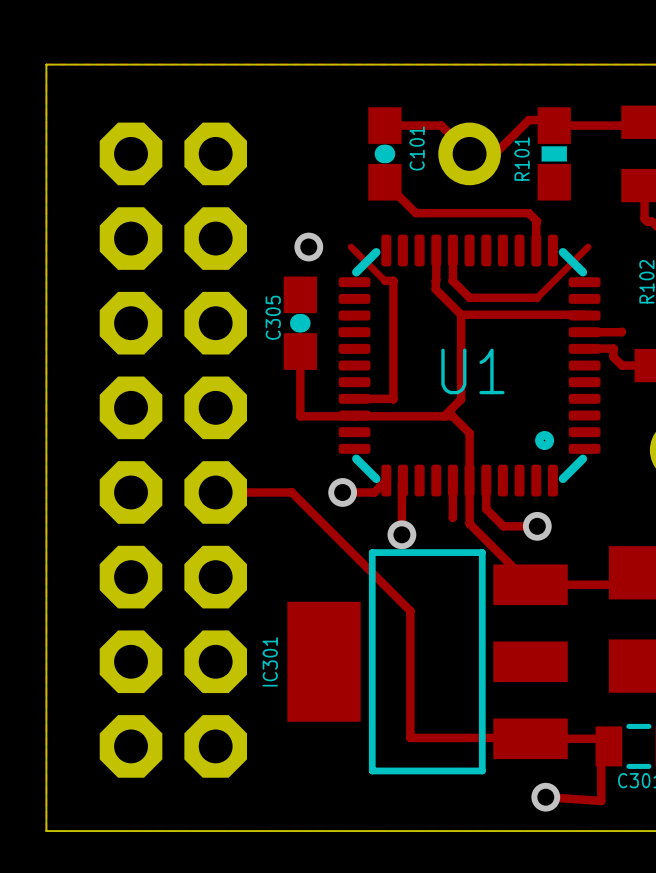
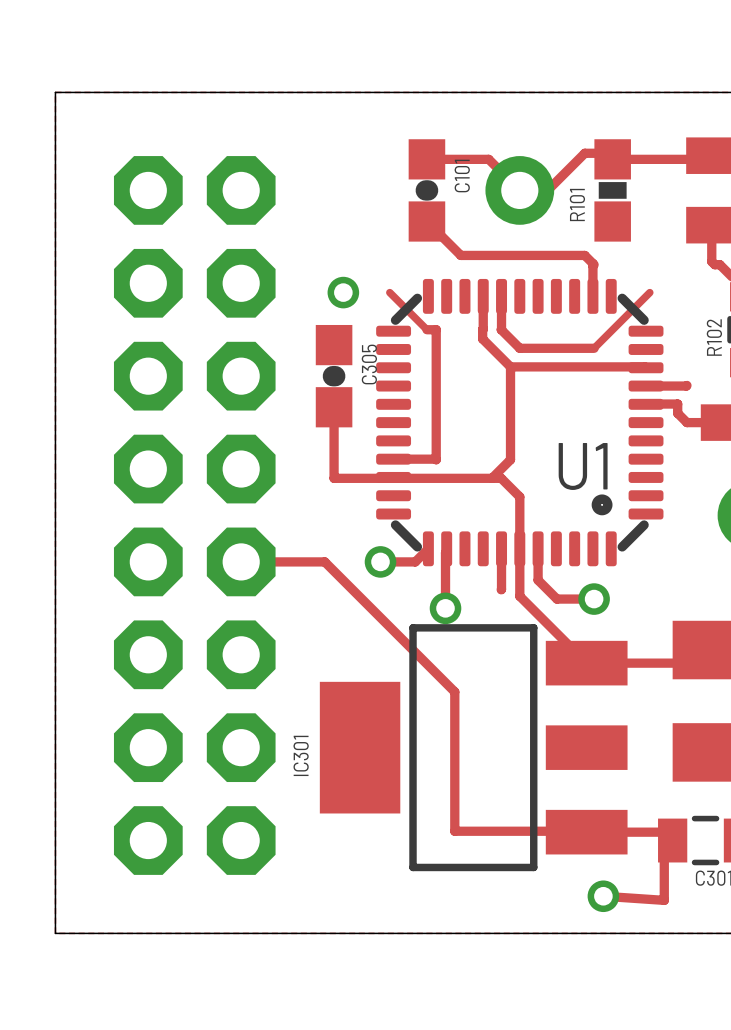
C305 name position: C305 (273, 317) -> C305 (369, 364)
U1 name position: U1 (472, 371) -> U1 (583, 466)

